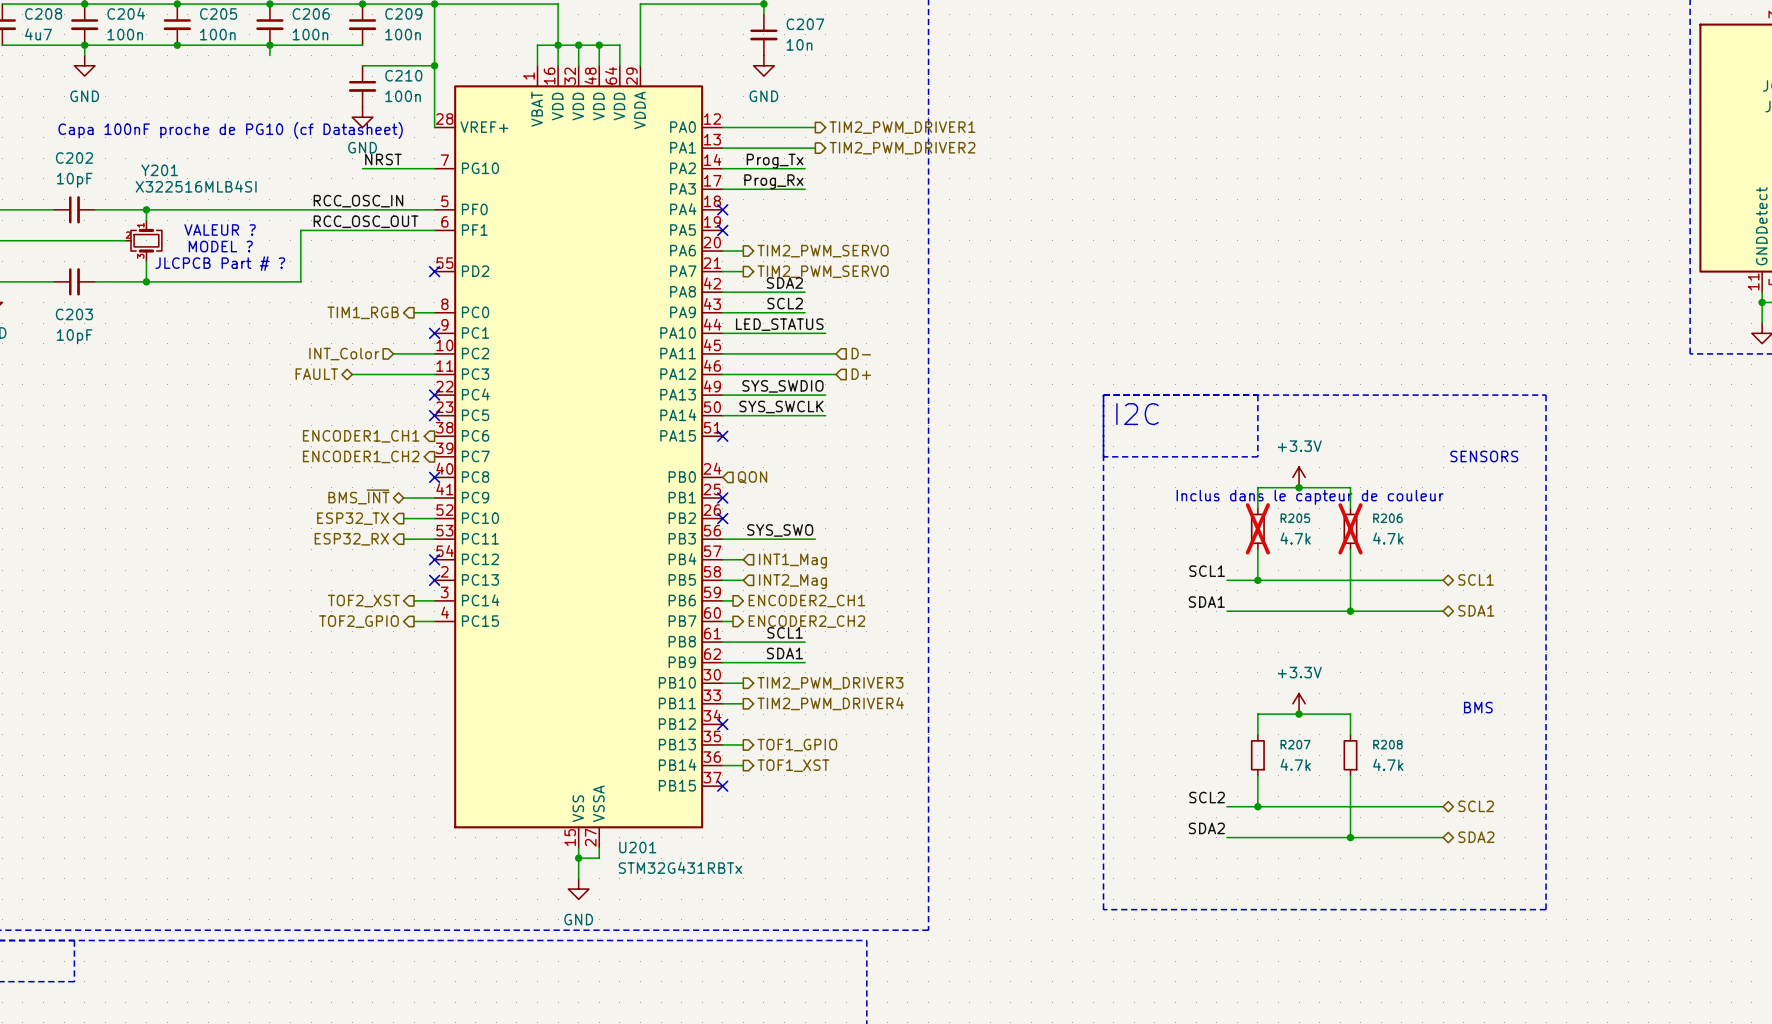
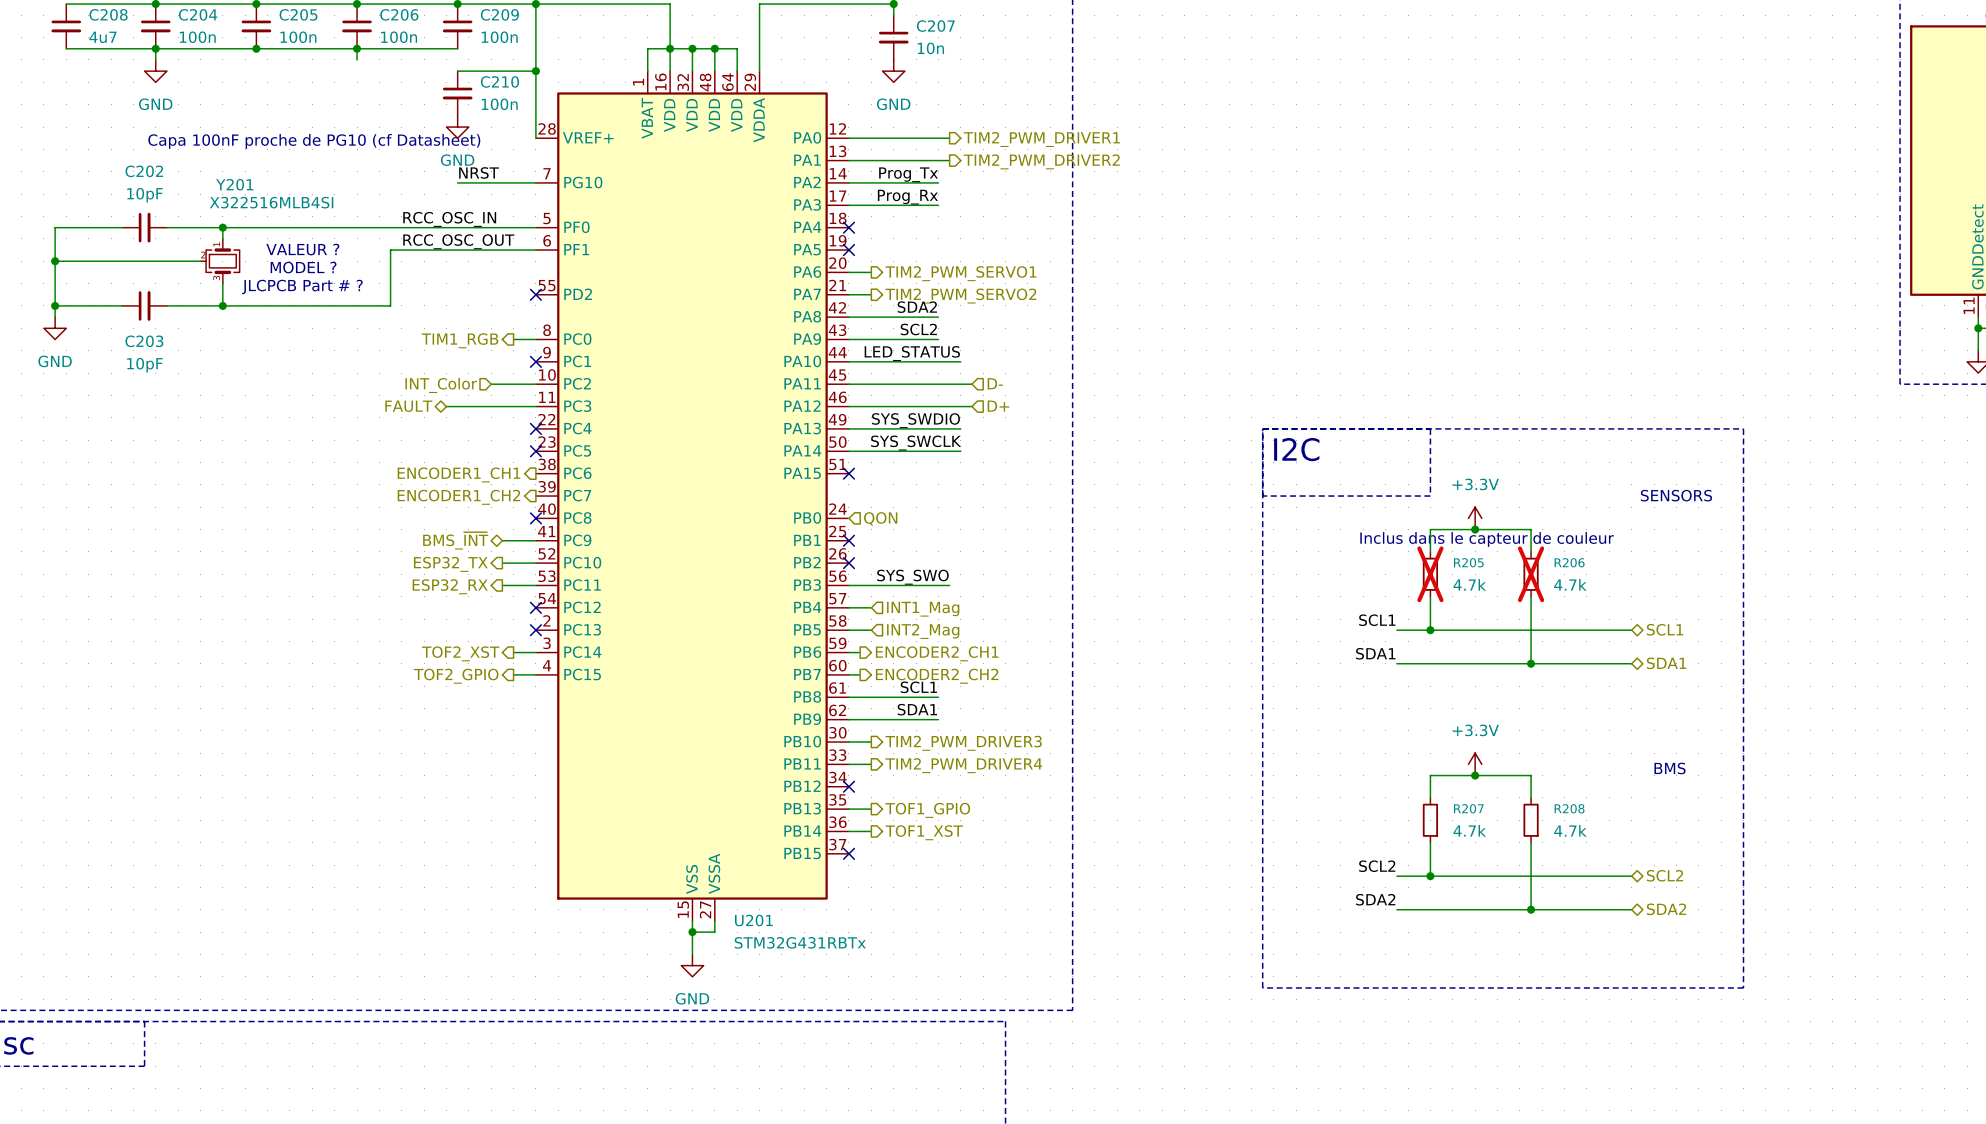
hierarchical label: TIM2_PWM_SERVO (823, 251) -> TIM2_PWM_SERVO1 (960, 273)
hierarchical label: TIM2_PWM_SERVO (823, 271) -> TIM2_PWM_SERVO2 (960, 296)

